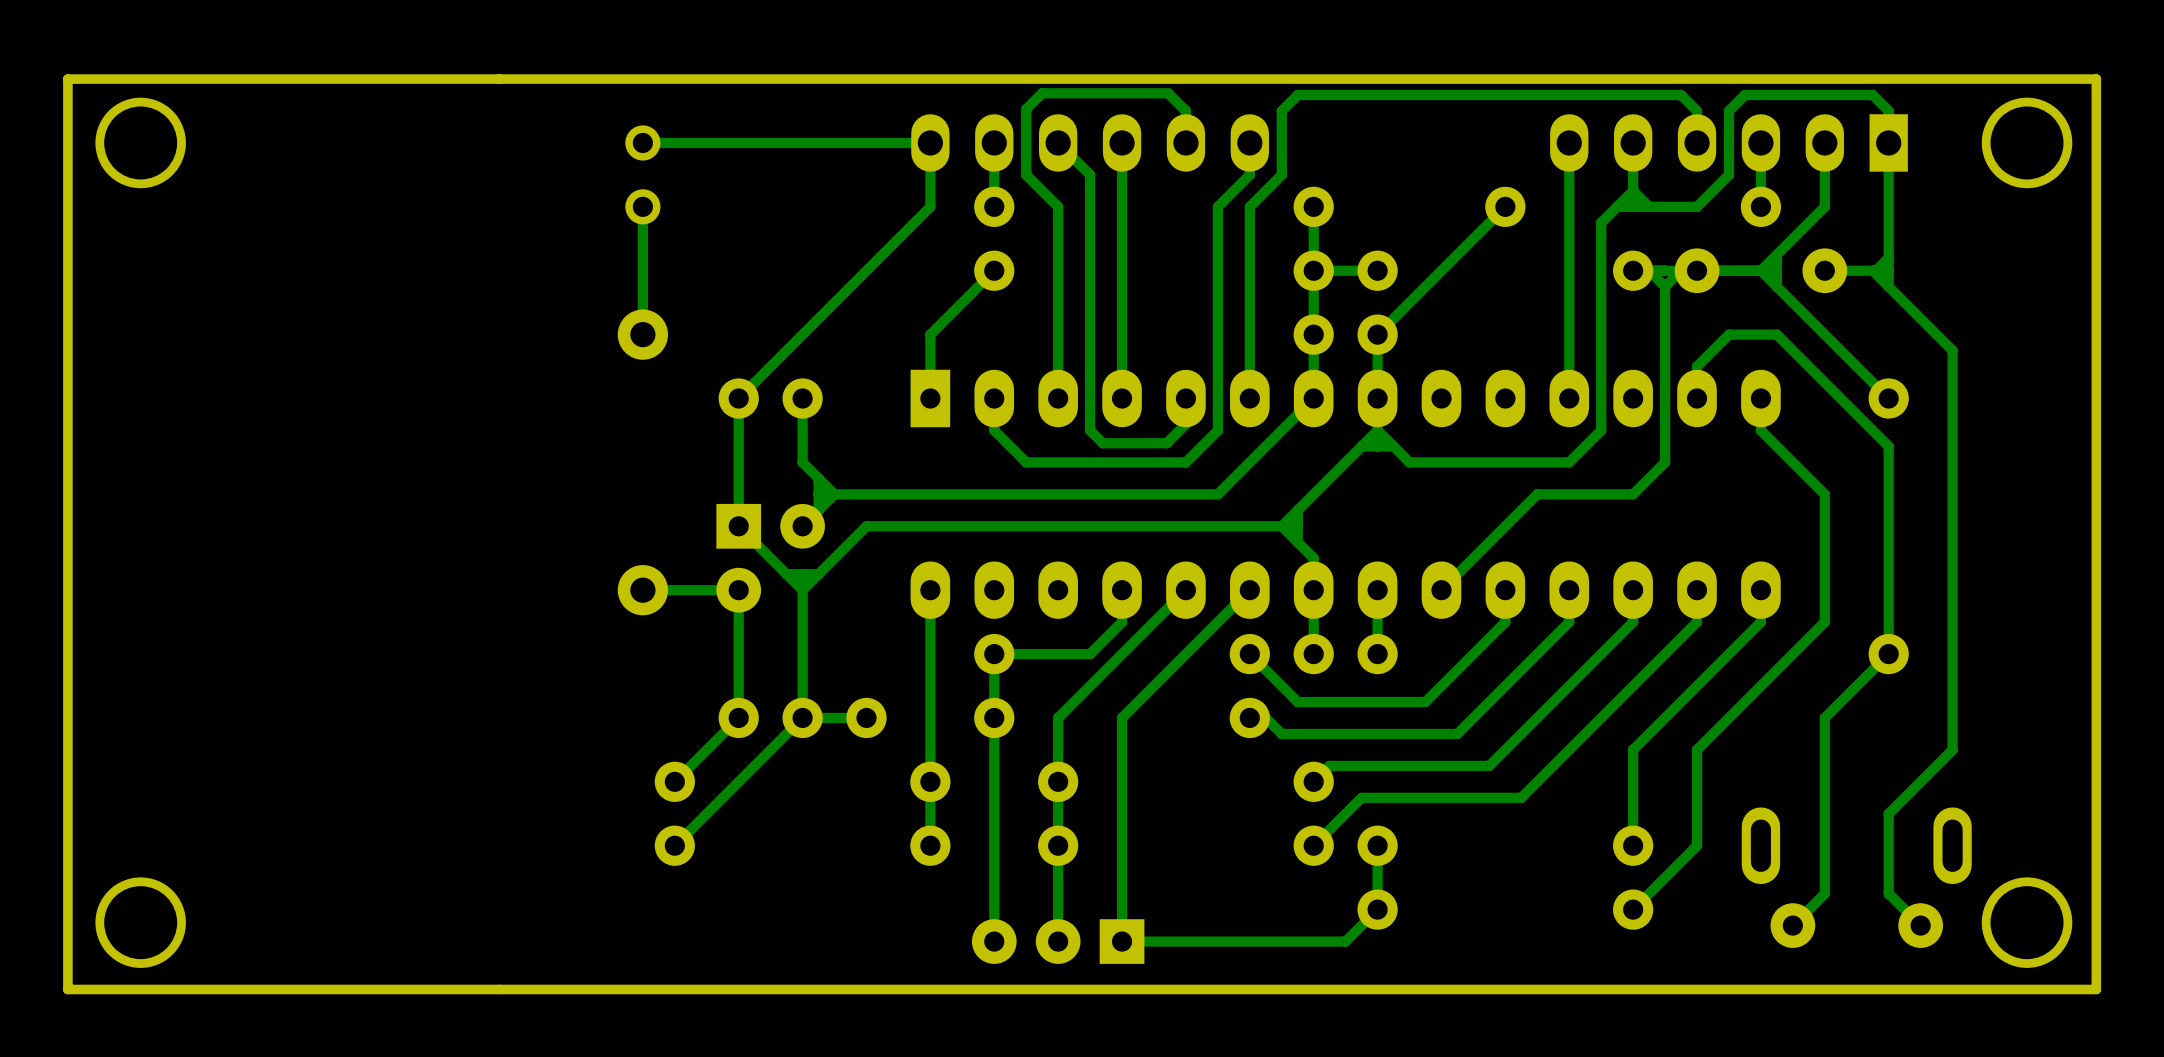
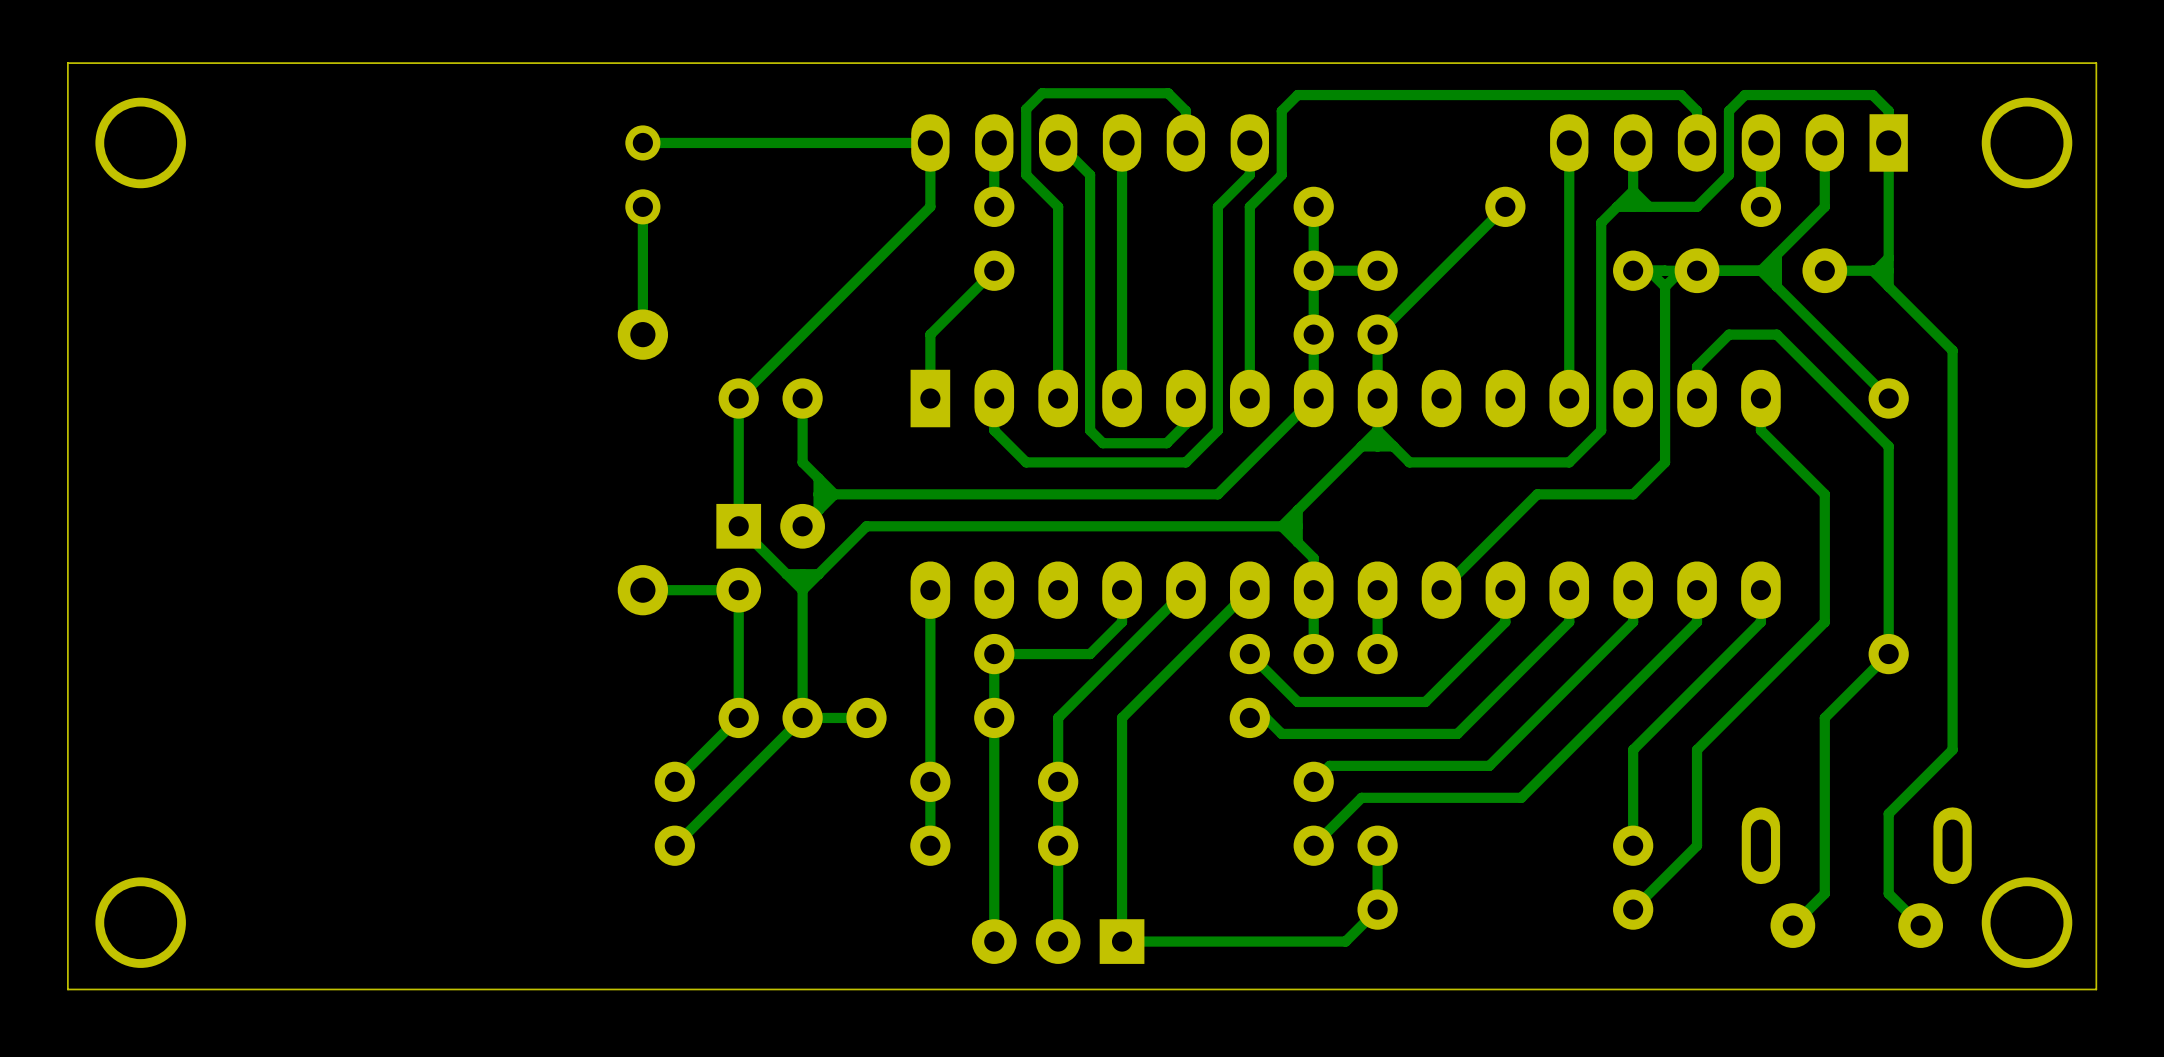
board edge: (2096, 79) (67, 79) -> (2096, 79) (2096, 63) (67, 63) (67, 79)
board edge width: thick (2096, 79) (2096, 989) (67, 989) (67, 79) -> thin (2096, 79) (2096, 989) (67, 989) (67, 79)

